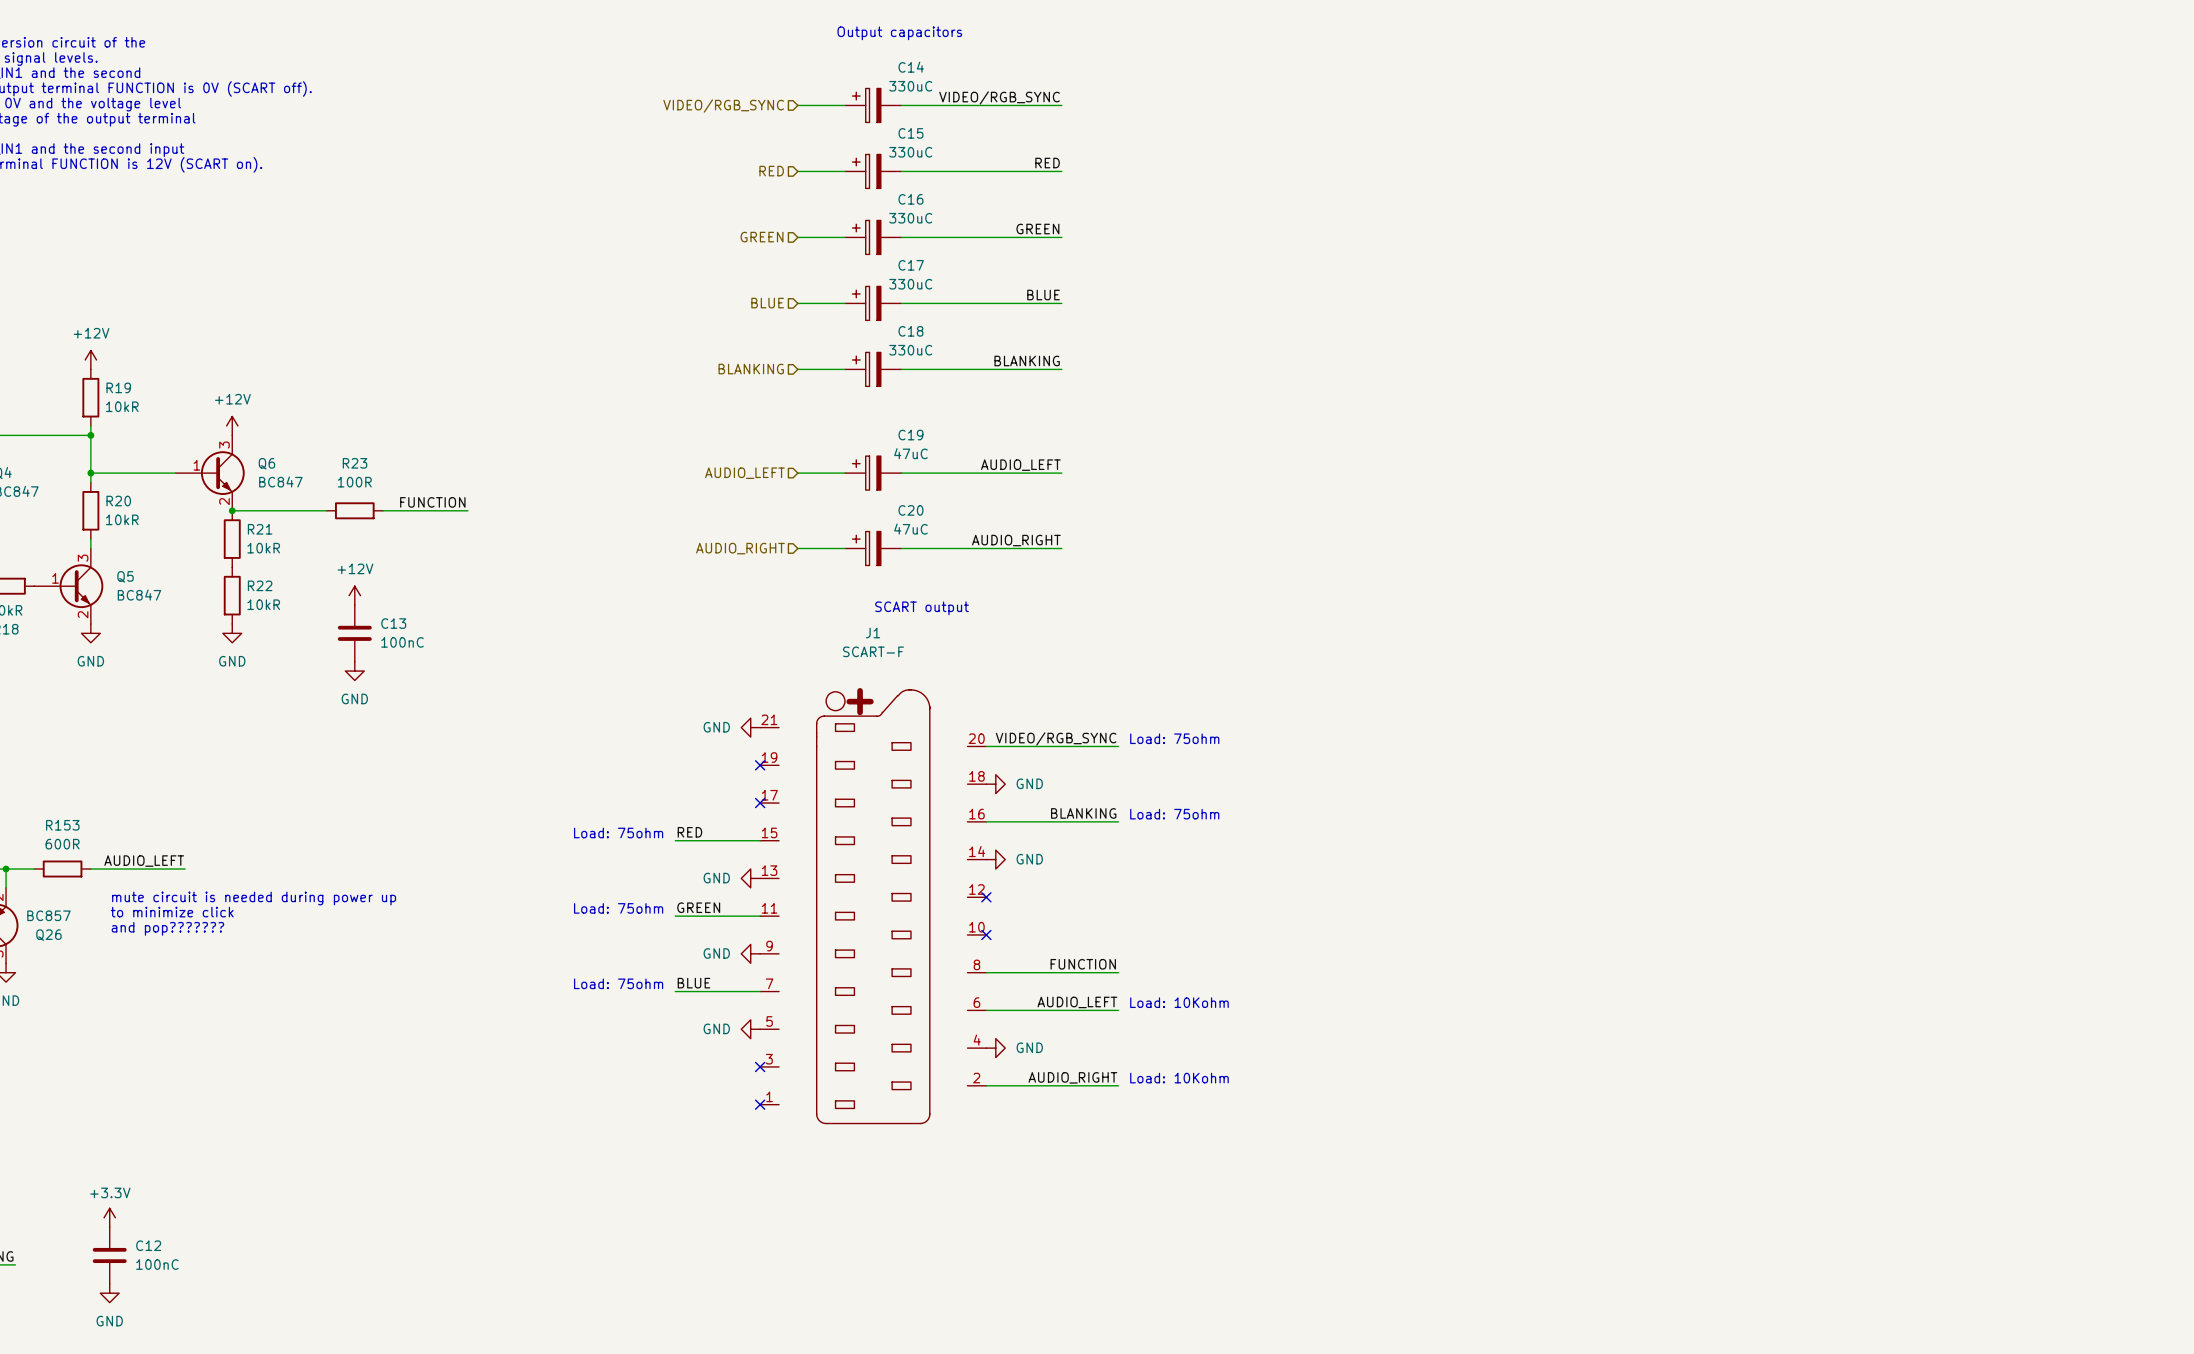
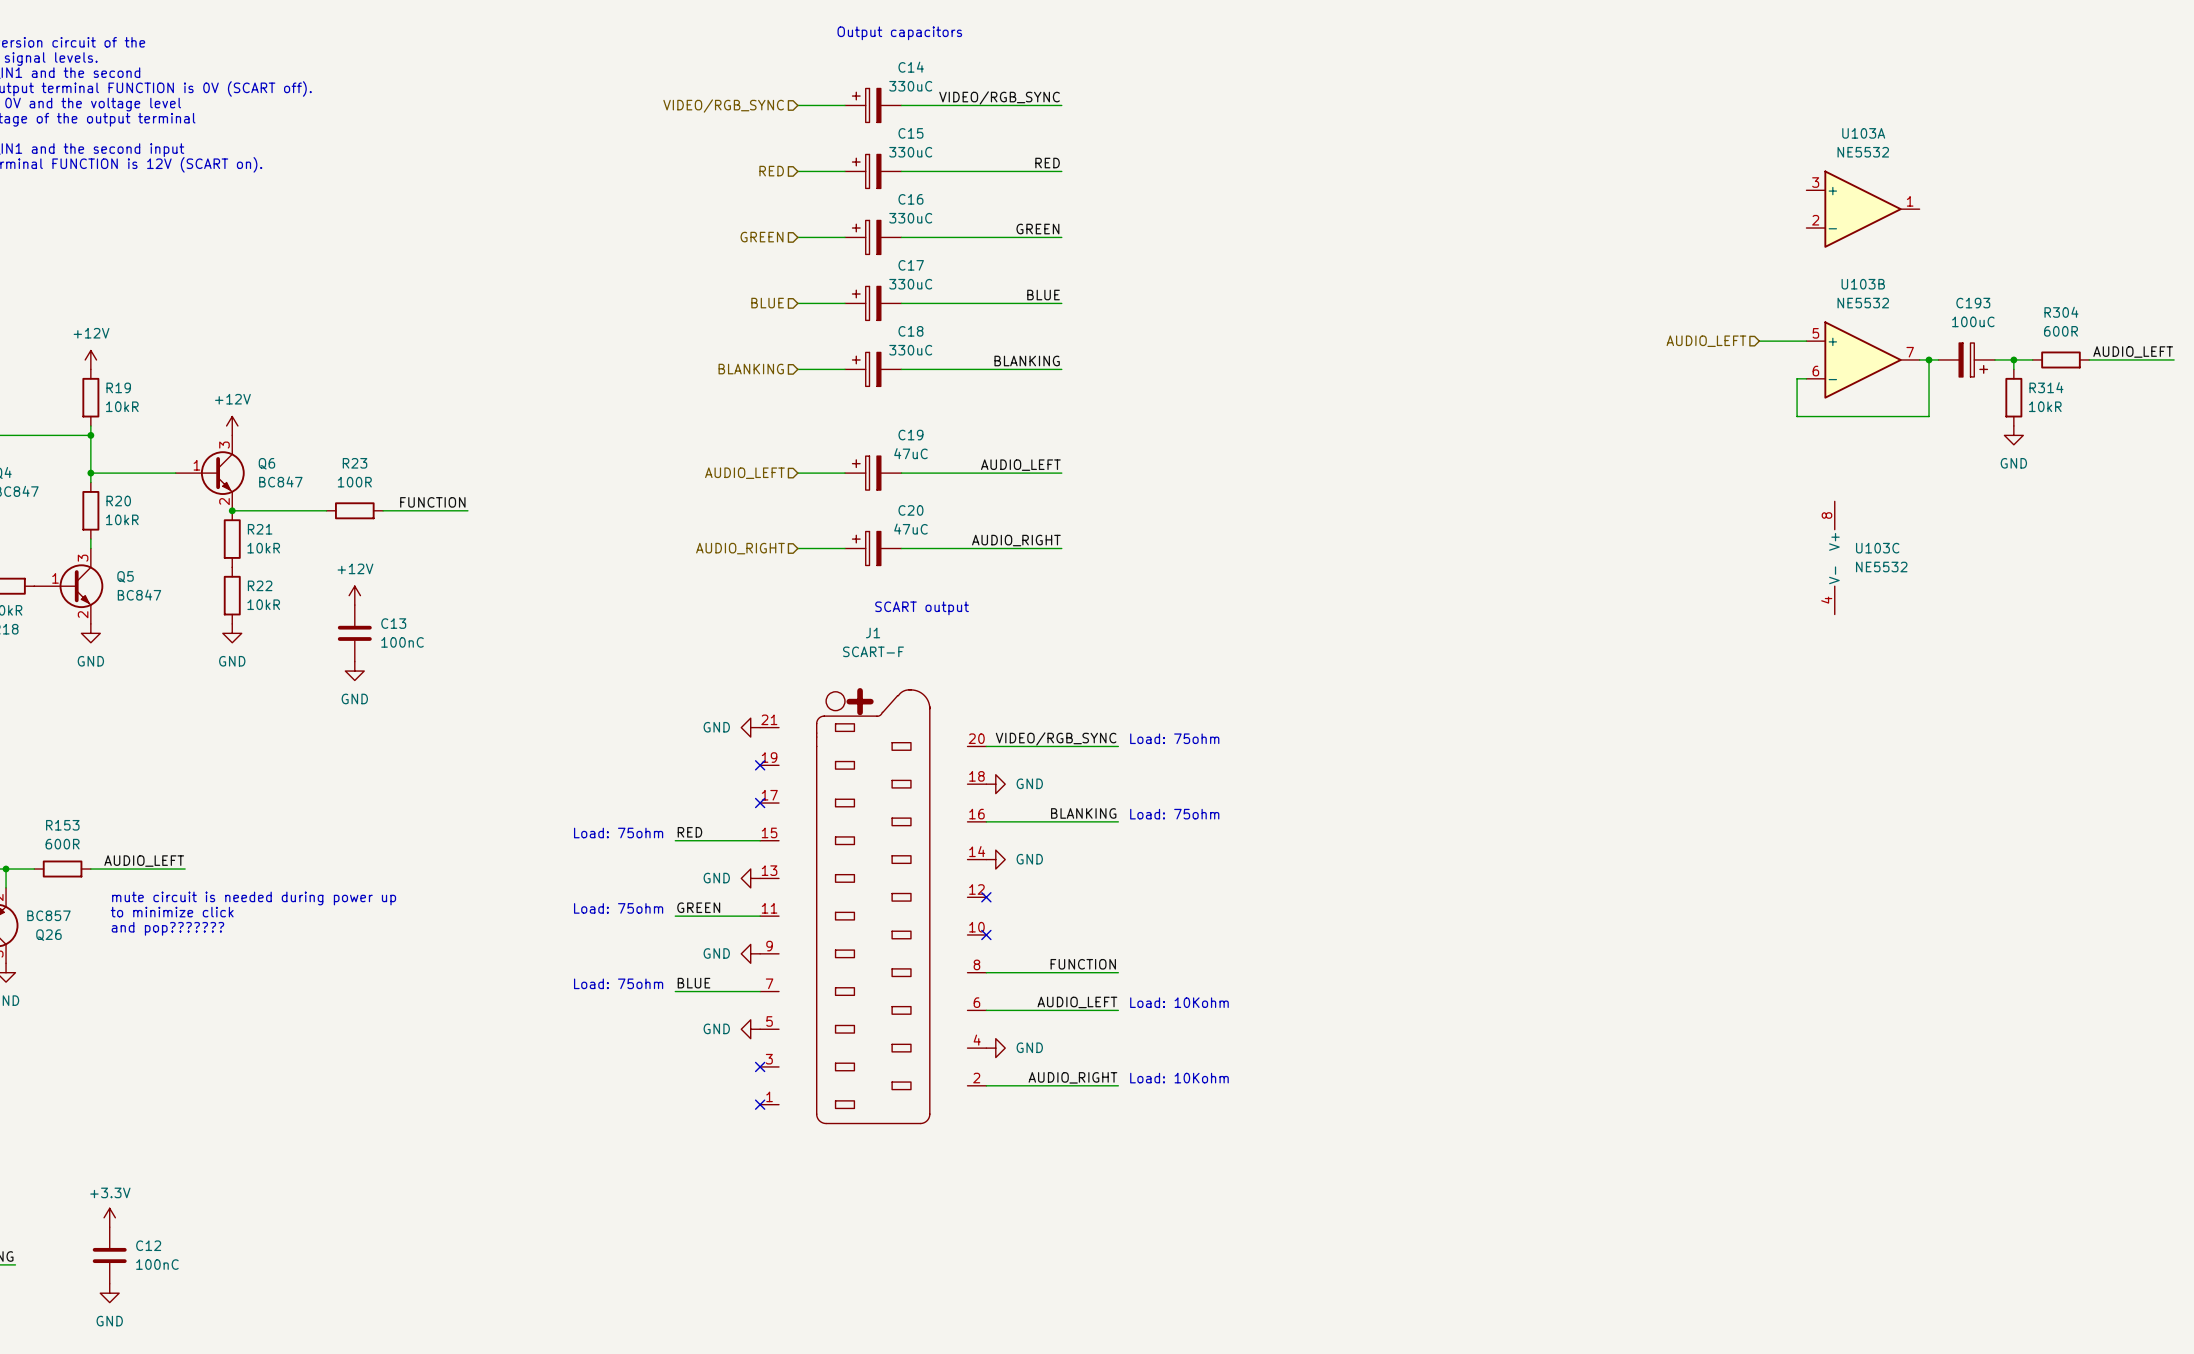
U103A: none -> NE5532 (1863, 209)
hierarchical label: none -> AUDIO_LEFT (1706, 341)
wire: none -> (1759, 341) (1806, 341)
label: none -> AUDIO_LEFT (2133, 352)
U103B: none -> NE5532 (1863, 359)
wire: none -> (1919, 359) (1938, 359)
wire: none -> (1929, 359) (1929, 416) (1797, 416) (1797, 378) (1806, 378)
junction: none -> (1929, 359)
C193: none -> 100uC (1966, 359)
wire: none -> (1995, 359) (2032, 359)
wire: none -> (2013, 359) (2013, 369)
junction: none -> (2013, 359)
R304: none -> 600R (2060, 359)
wire: none -> (2089, 359) (2174, 359)
R314: none -> 10kR (2013, 397)
power symbol: none -> GND (2013, 435)
U103C: none -> NE5532 (1834, 557)

